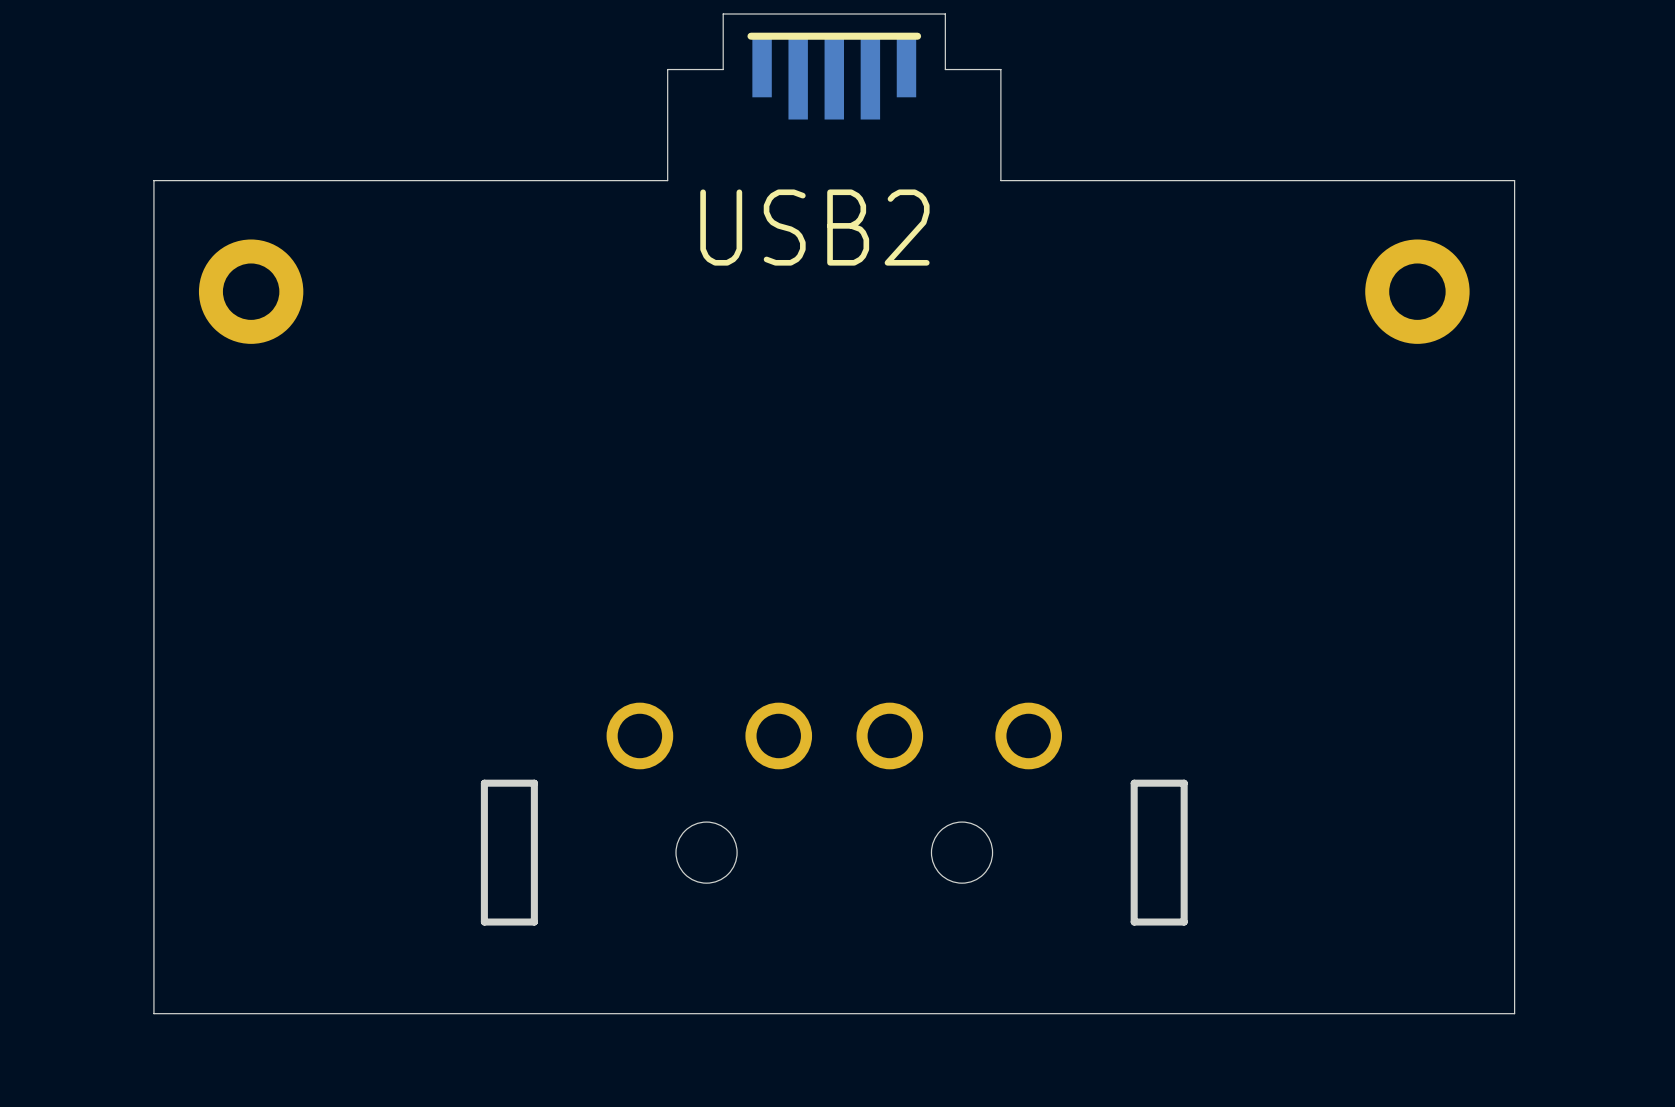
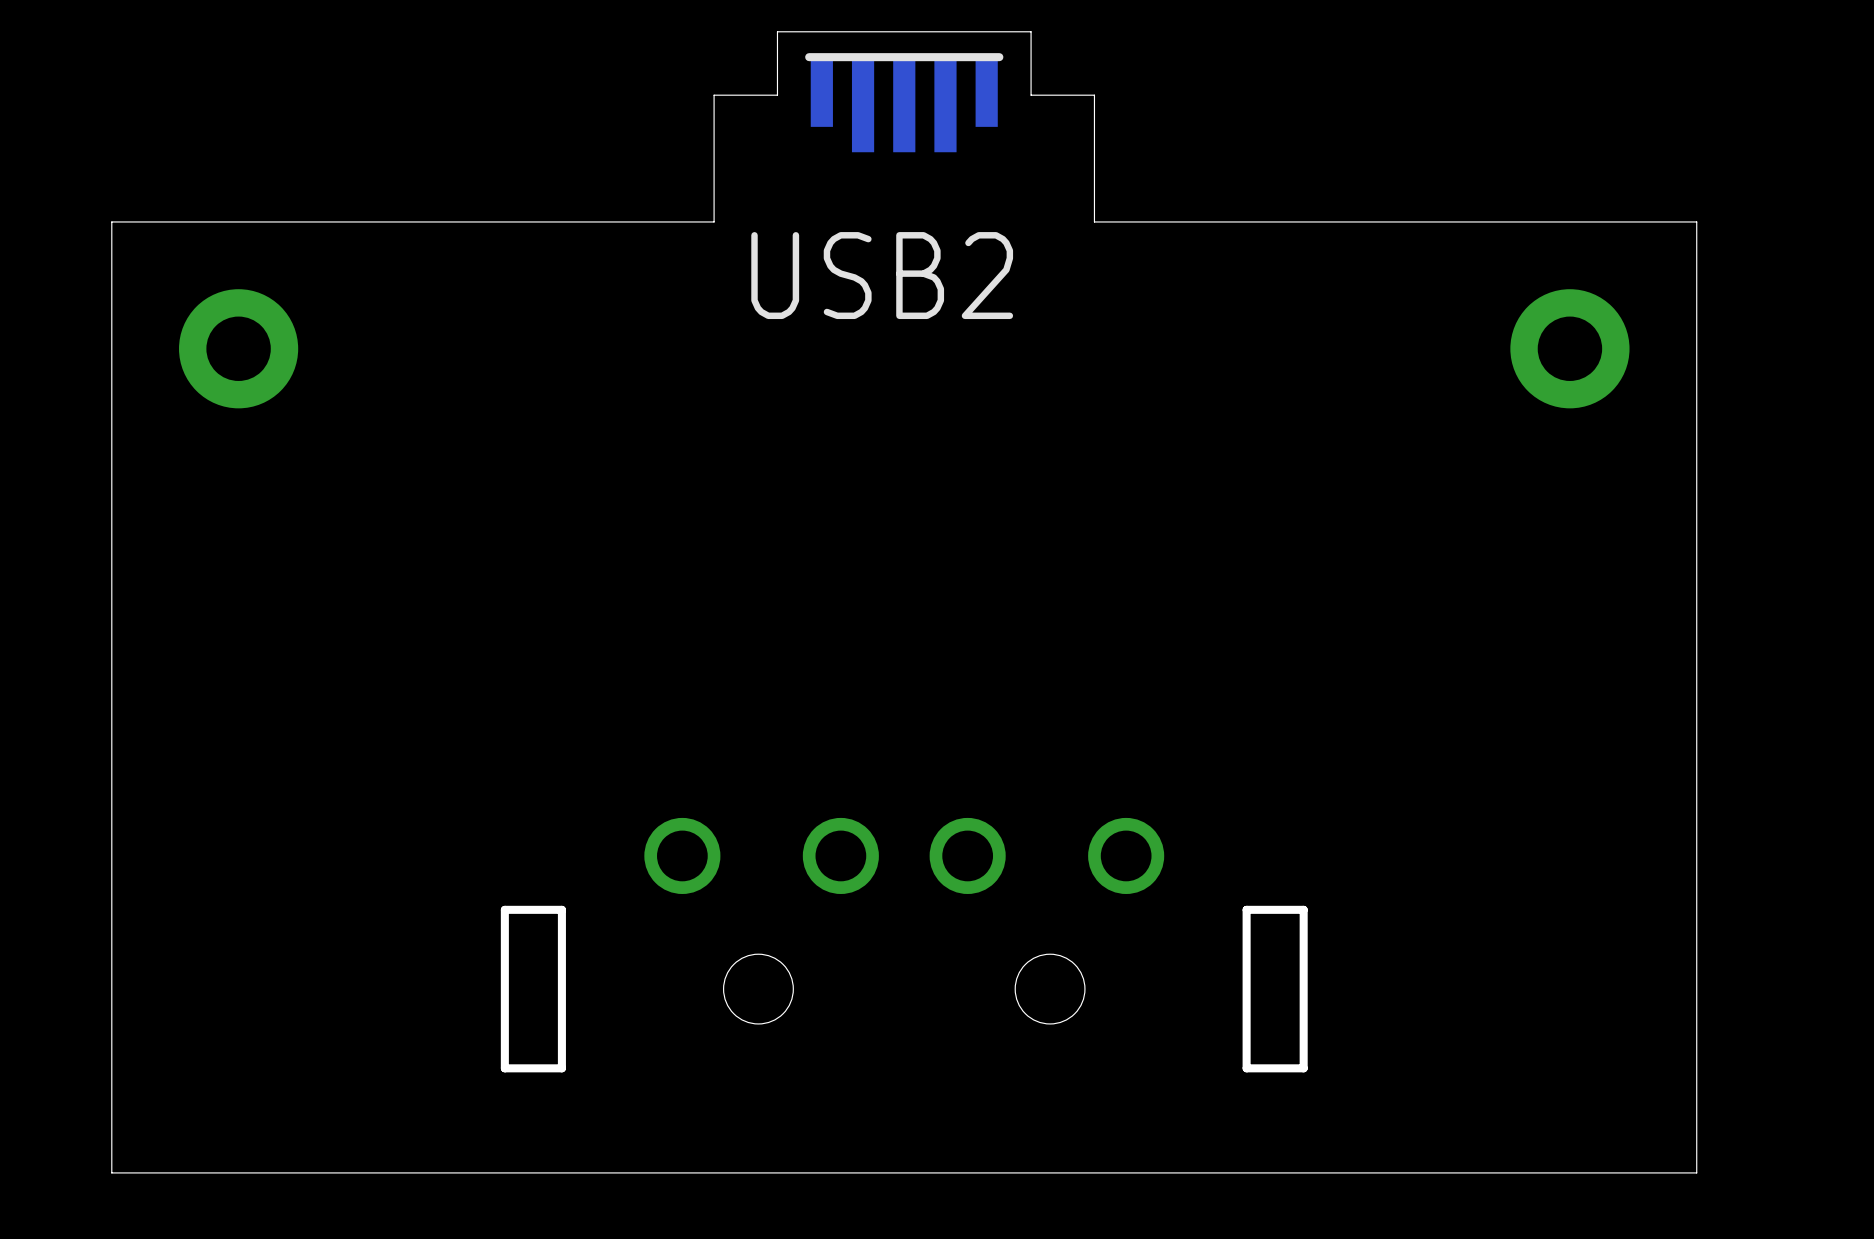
board edge: (153, 180) (153, 1013) -> (127, 221) (111, 221) (111, 1172) (127, 1172)
board edge: (1514, 180) (1514, 1013) -> (1680, 221) (1696, 221) (1696, 1172) (1680, 1172)

